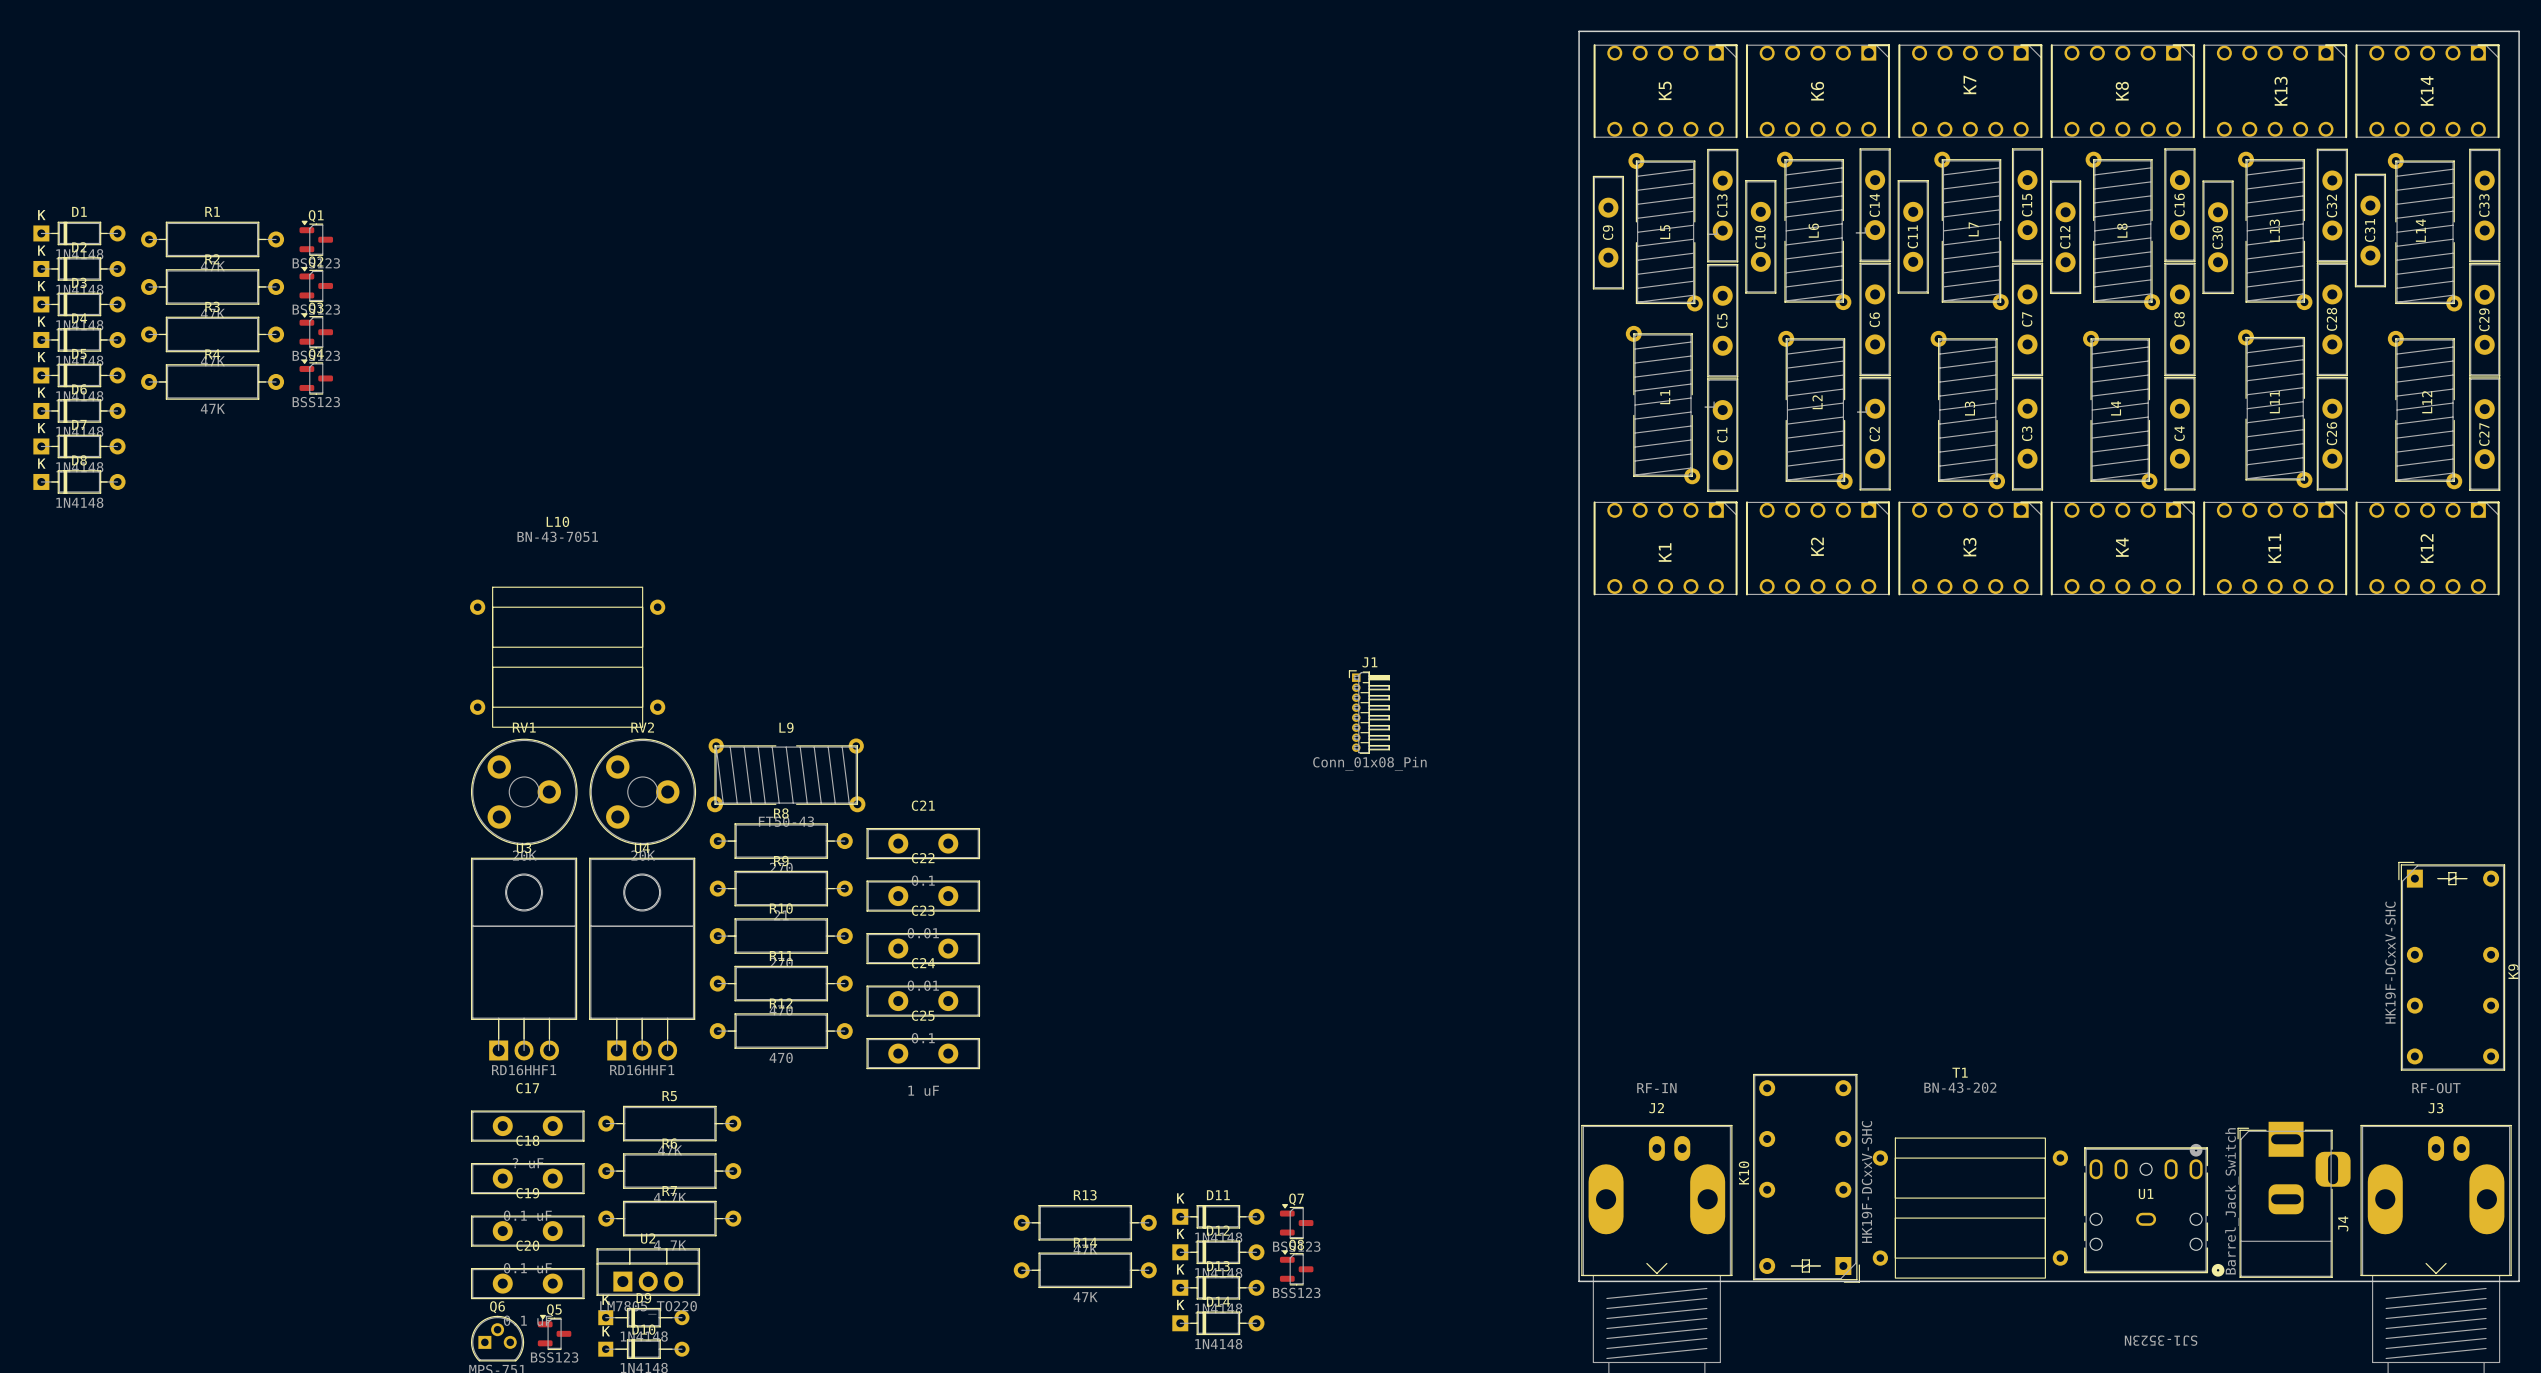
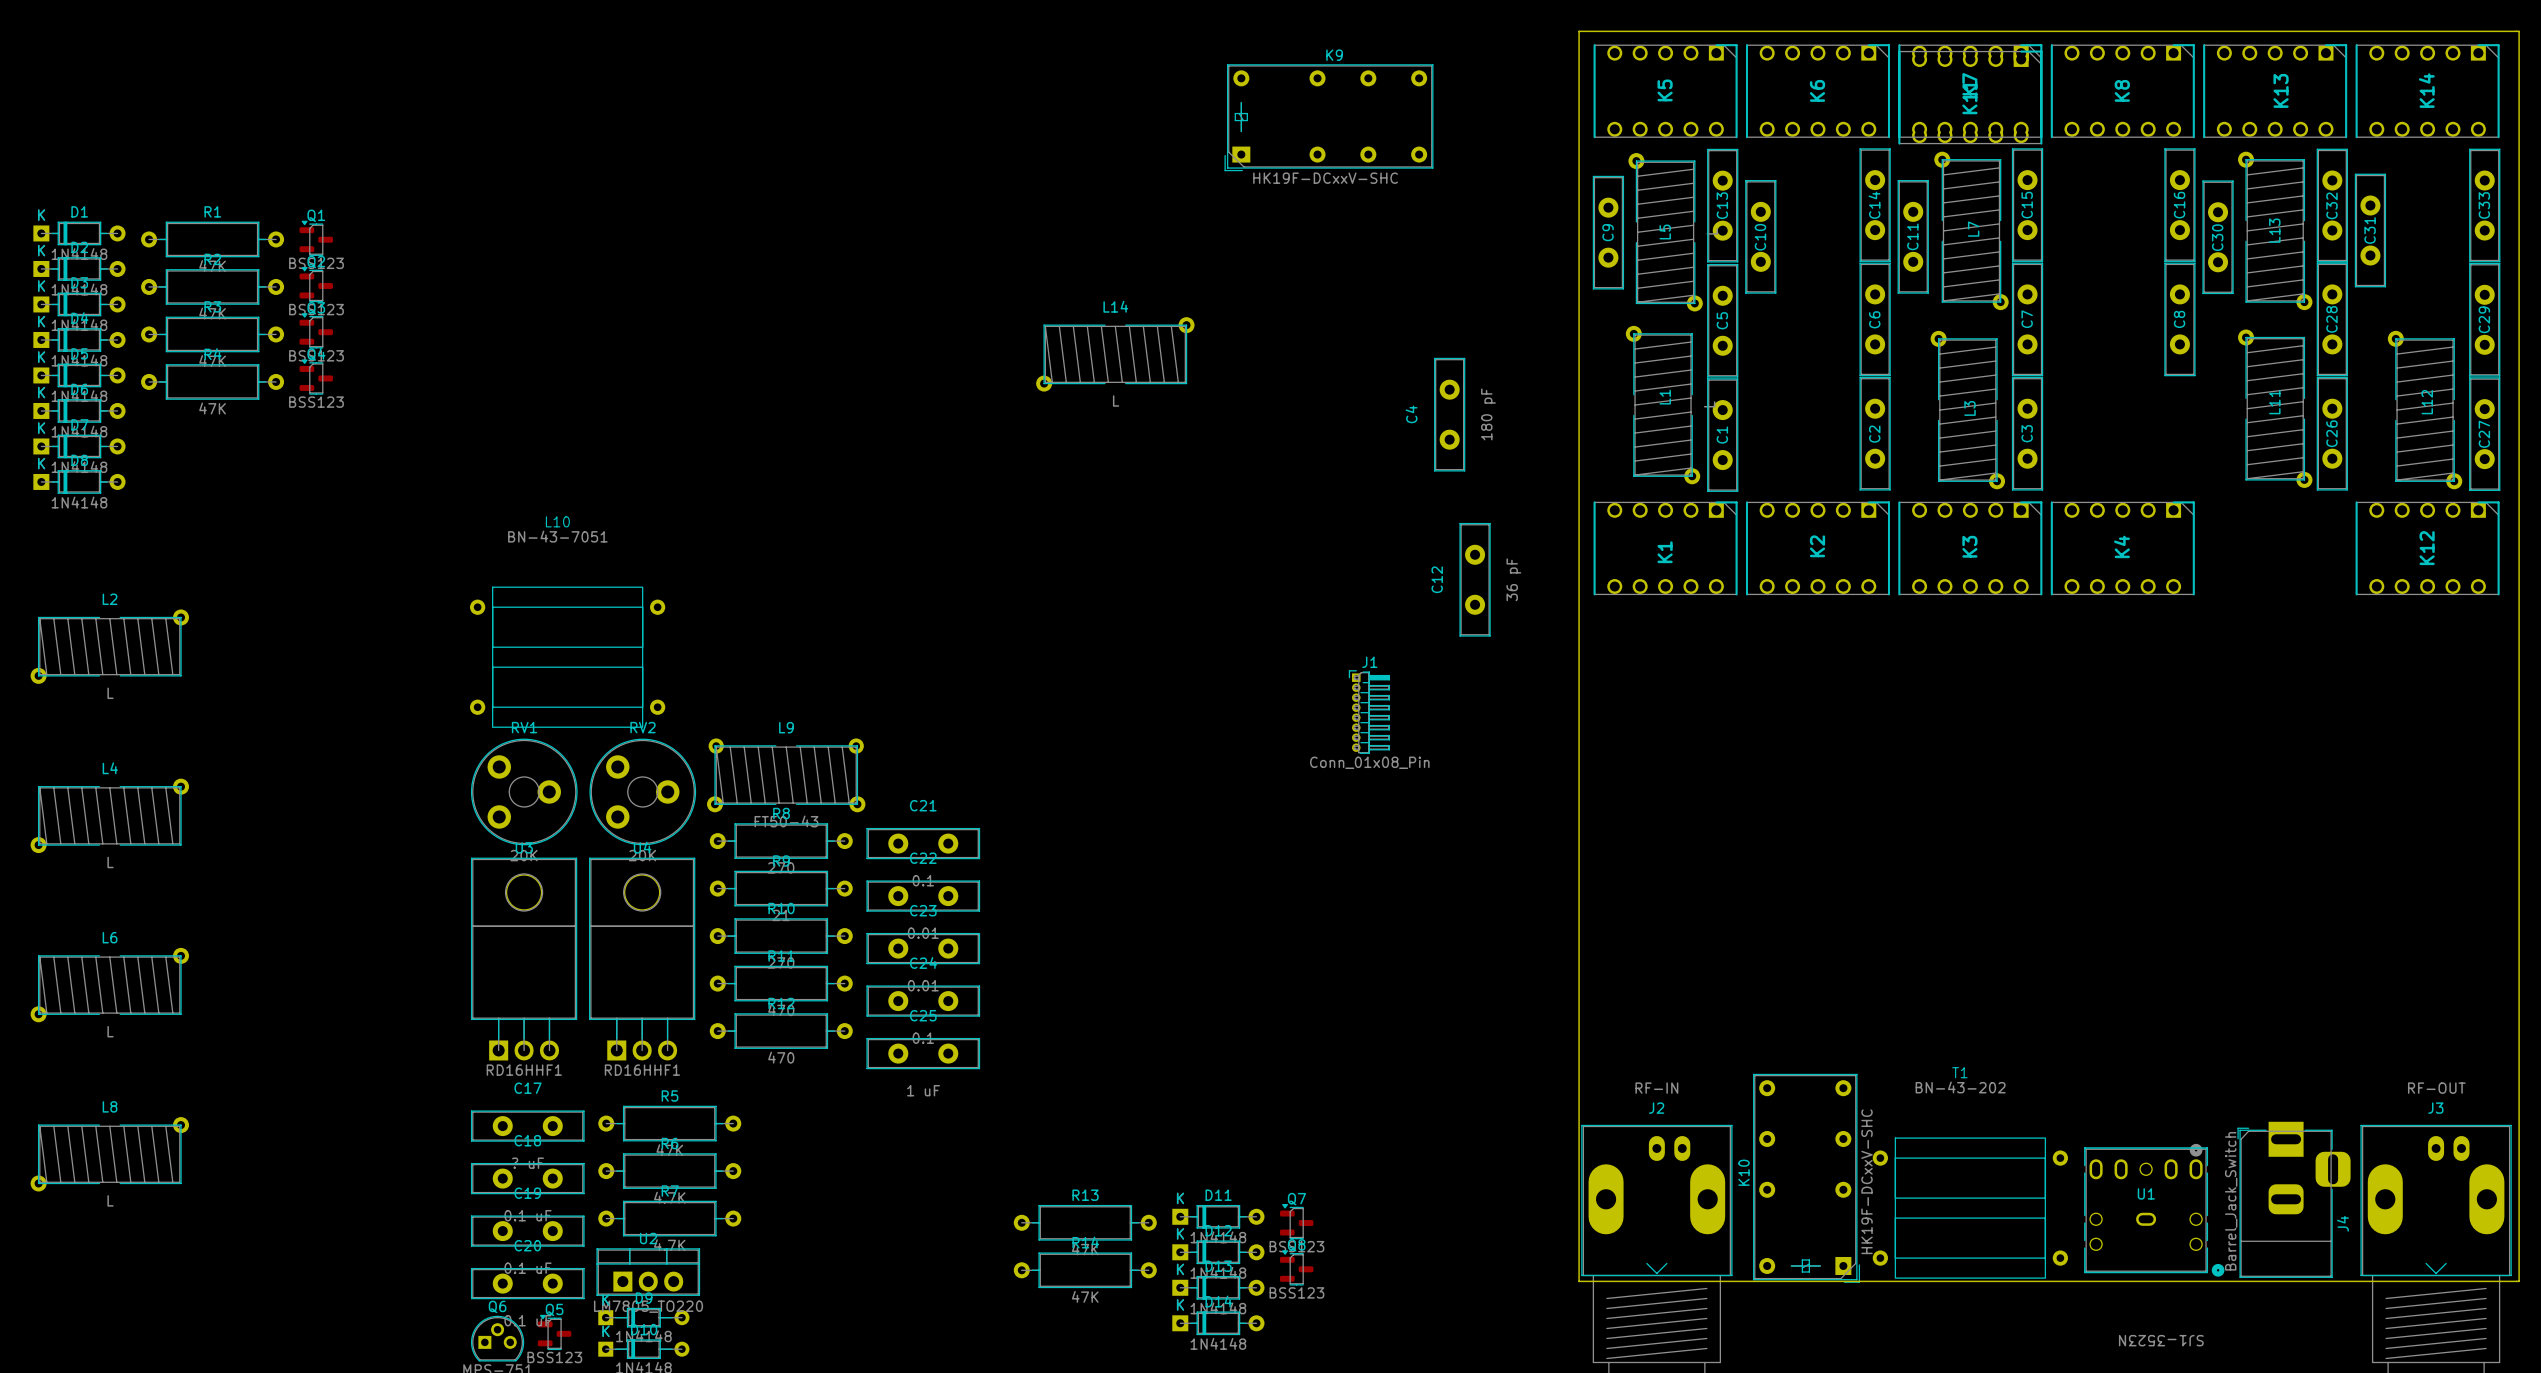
L6 name position: L6 (1813, 230) -> L6 (110, 937)
L6 rotation: 0° (1814, 230) -> 90° clockwise (109, 985)
L6 position: (1814, 230) -> (109, 985)
L8 rotation: 0° (2122, 230) -> 90° clockwise (109, 1154)
L8 position: (2122, 230) -> (109, 1154)
L8 name position: L8 (2122, 230) -> L8 (110, 1106)
L14 name position: L14 (2420, 230) -> L14 (1115, 306)
L14 rotation: 0° (2425, 232) -> 90° clockwise (1115, 354)
L14 position: (2425, 232) -> (1115, 354)
C12 position: (2065, 237) -> (1475, 579)
C12 name position: C12 (2065, 237) -> C12 (1437, 579)
L14 value: none -> L (1116, 400)
L2 name position: L2 (1817, 402) -> L2 (110, 599)
L4 name position: L4 (2116, 408) -> L4 (110, 768)
L2 rotation: 0° (1815, 410) -> 90° clockwise (109, 646)
L2 position: (1815, 410) -> (109, 646)
L4 rotation: 0° (2120, 410) -> 90° clockwise (109, 815)
L4 position: (2120, 410) -> (109, 815)
C4 value: none -> 180 pF (1488, 414)
C4 position: (2179, 433) -> (1449, 414)
C4 name position: C4 (2179, 433) -> C4 (1411, 414)
K11 position: (2275, 548) -> (1970, 97)
C12 value: none -> 36 pF (1513, 579)
L4 value: none -> L (110, 862)
K9 rotation: 0° (2451, 966) -> 90° counterclockwise (1328, 117)
K9 position: (2451, 966) -> (1328, 117)
L8 value: none -> L (110, 1200)

